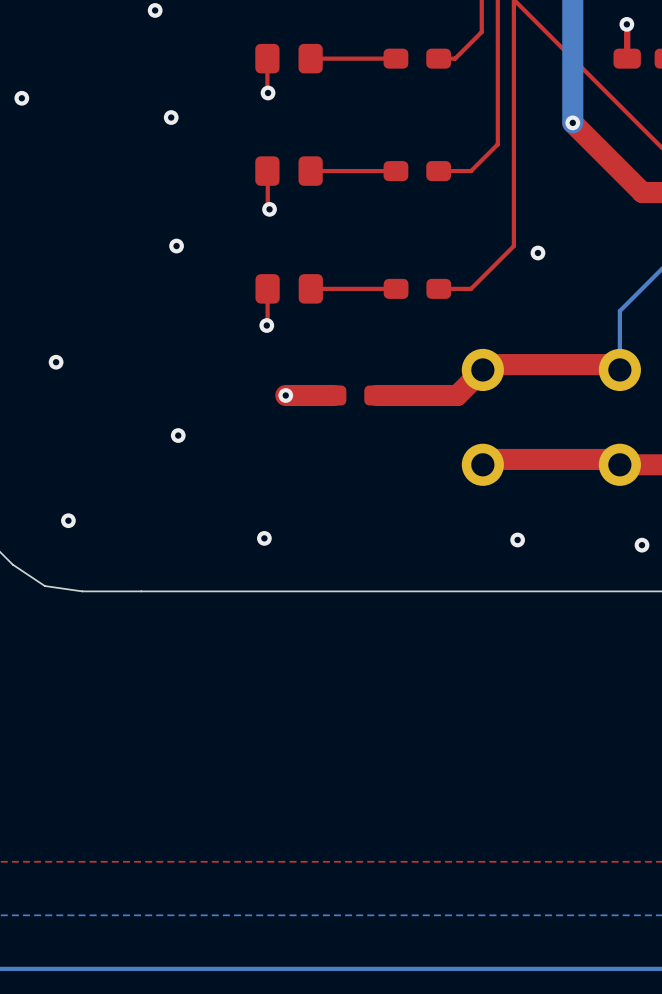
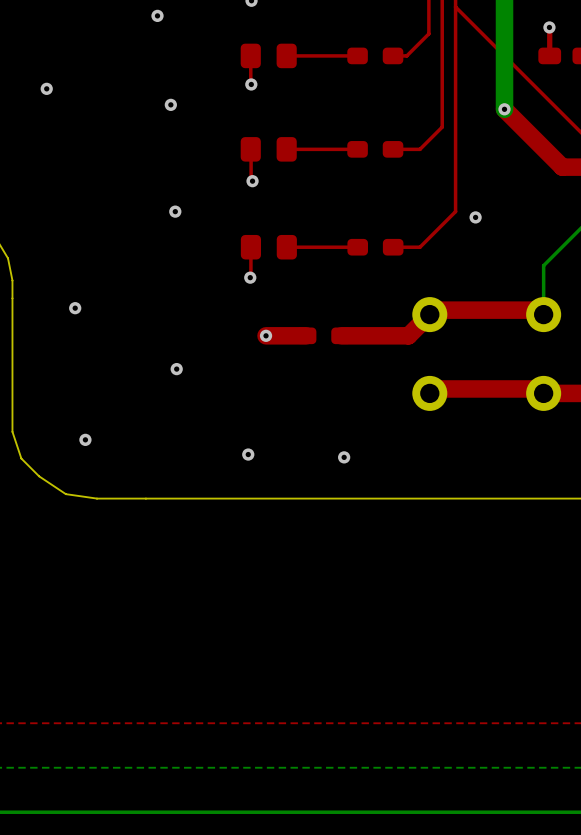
via: (517, 539) -> none
via: none -> (344, 457)
via: (642, 545) -> none

